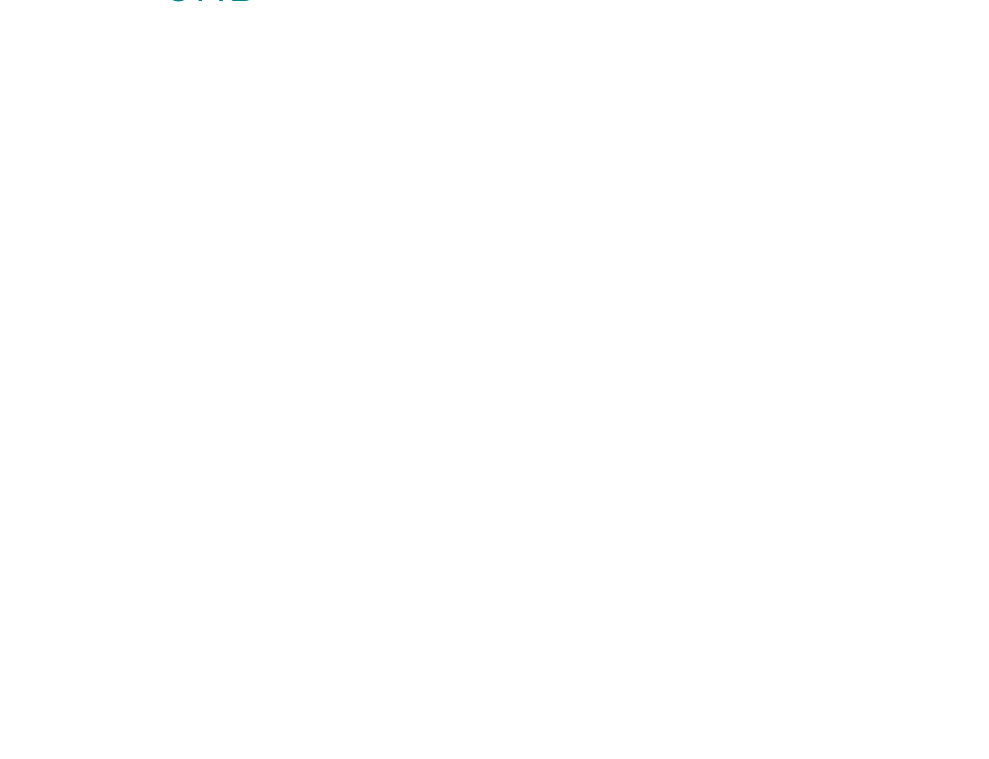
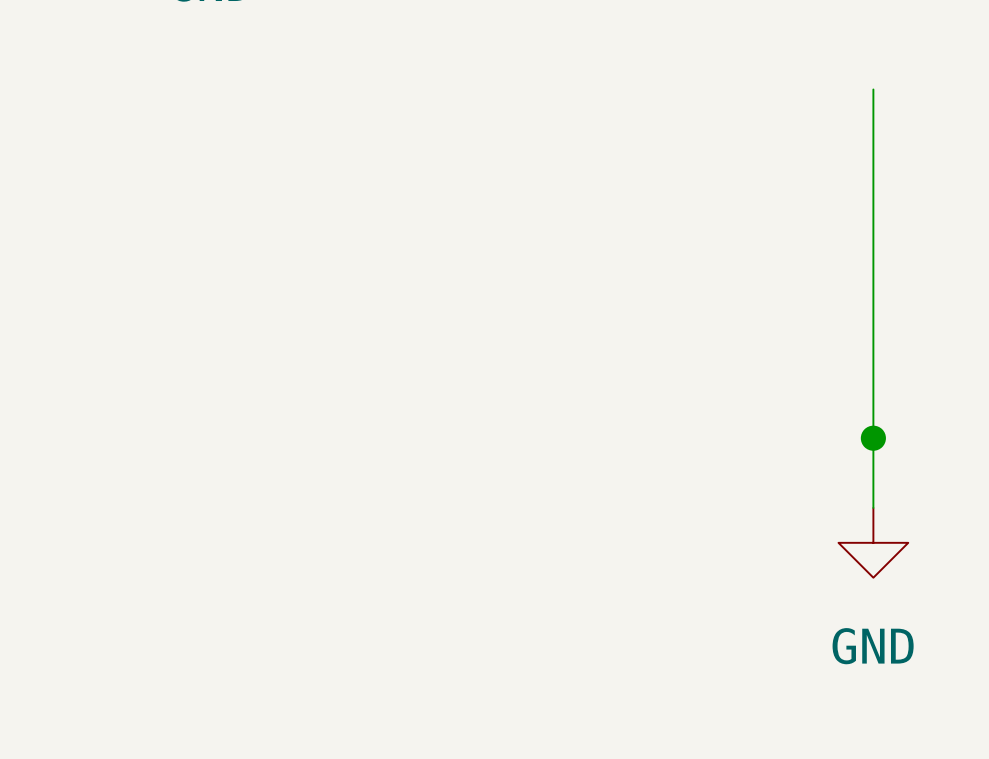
wire: none -> (873, 89) (873, 507)
junction: none -> (873, 438)
power symbol: none -> GND (873, 542)

